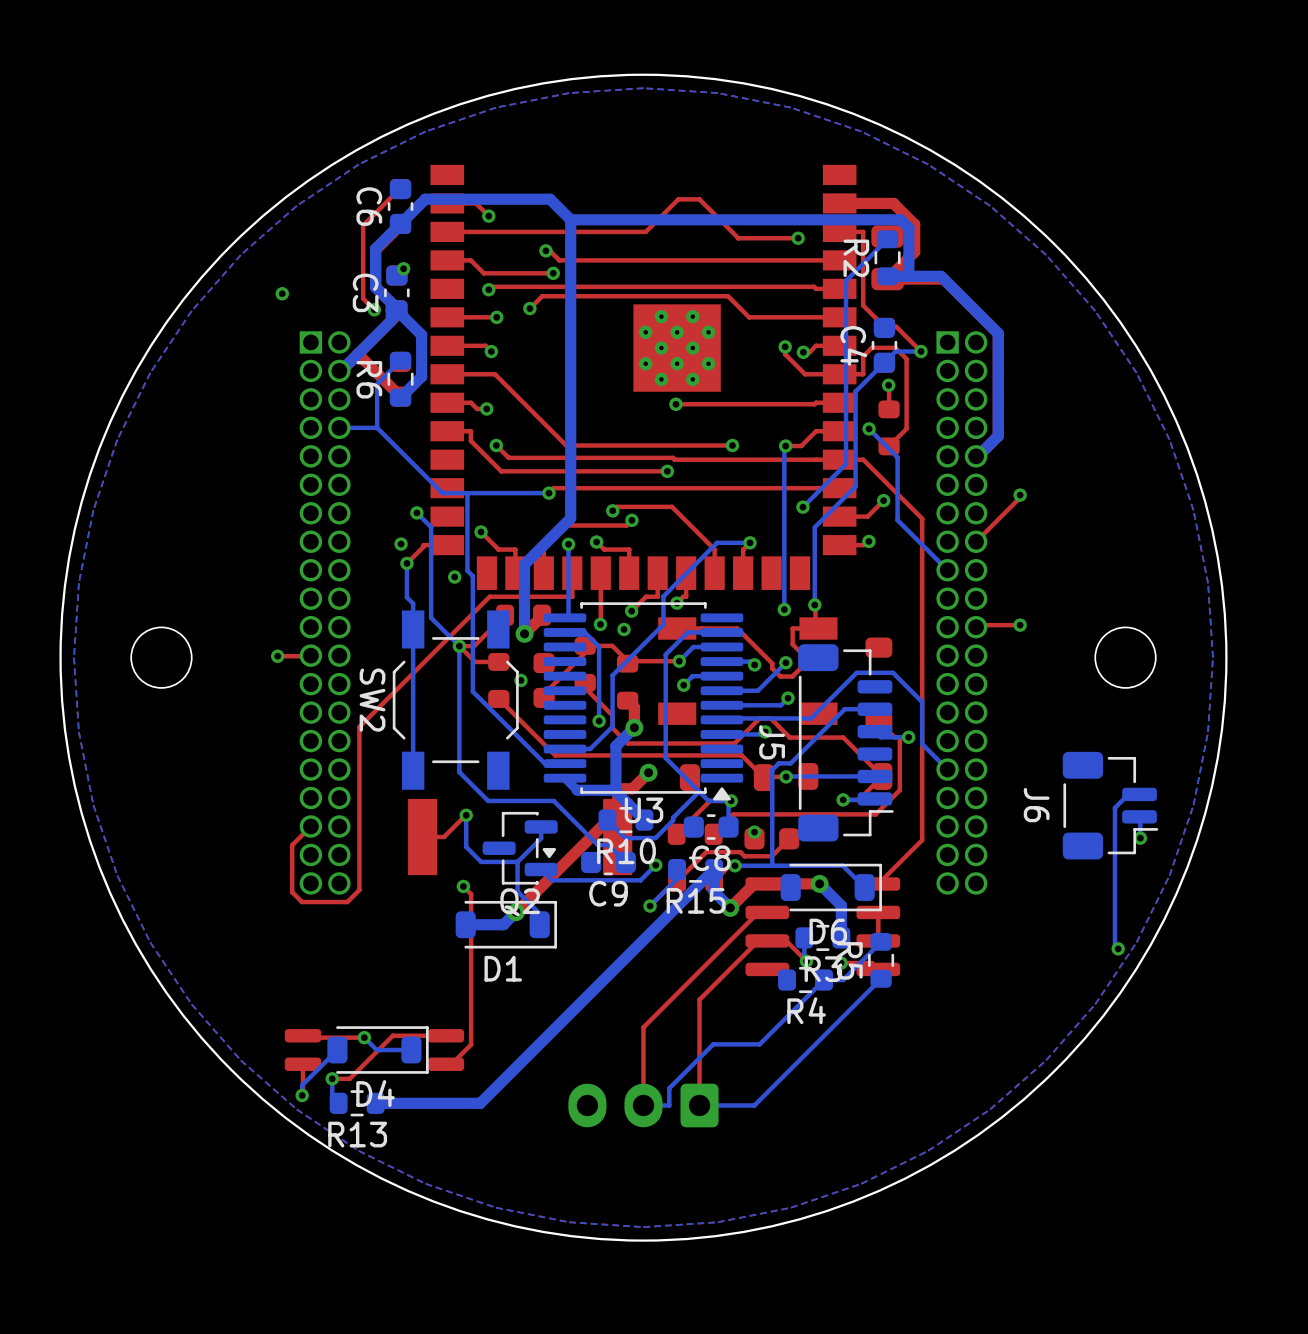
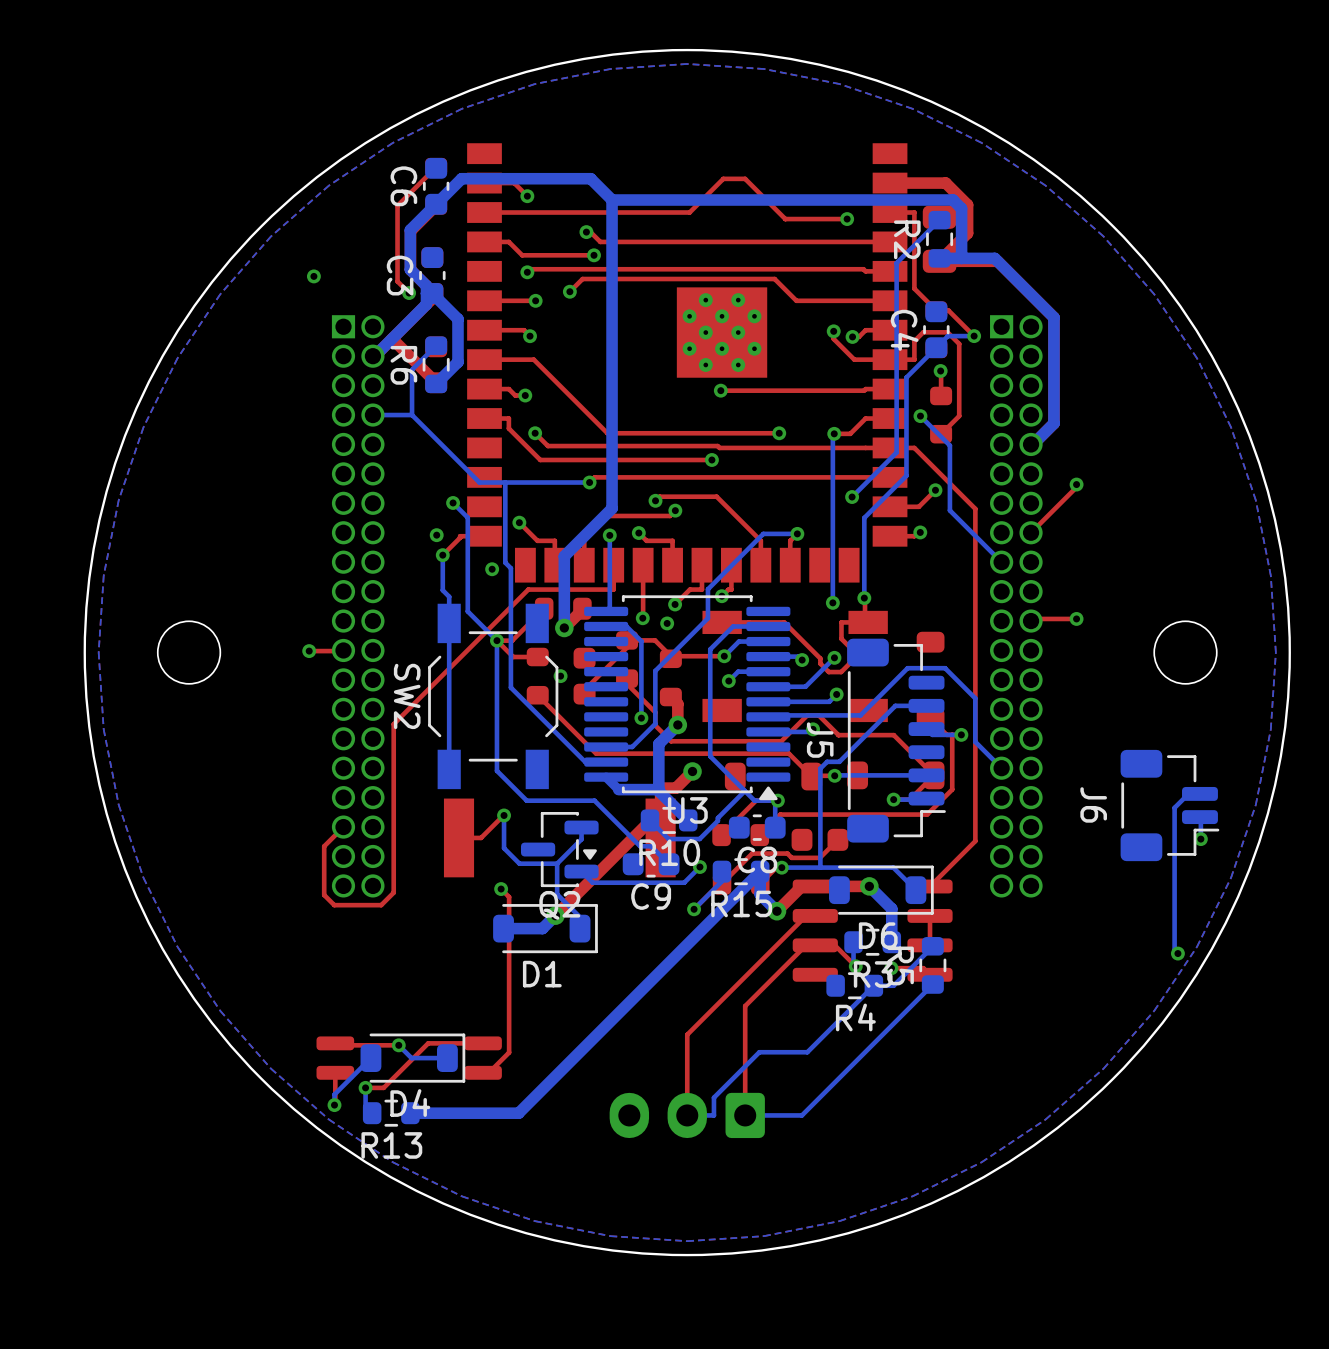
via: (403, 268) -> none
via: (754, 832) -> none

